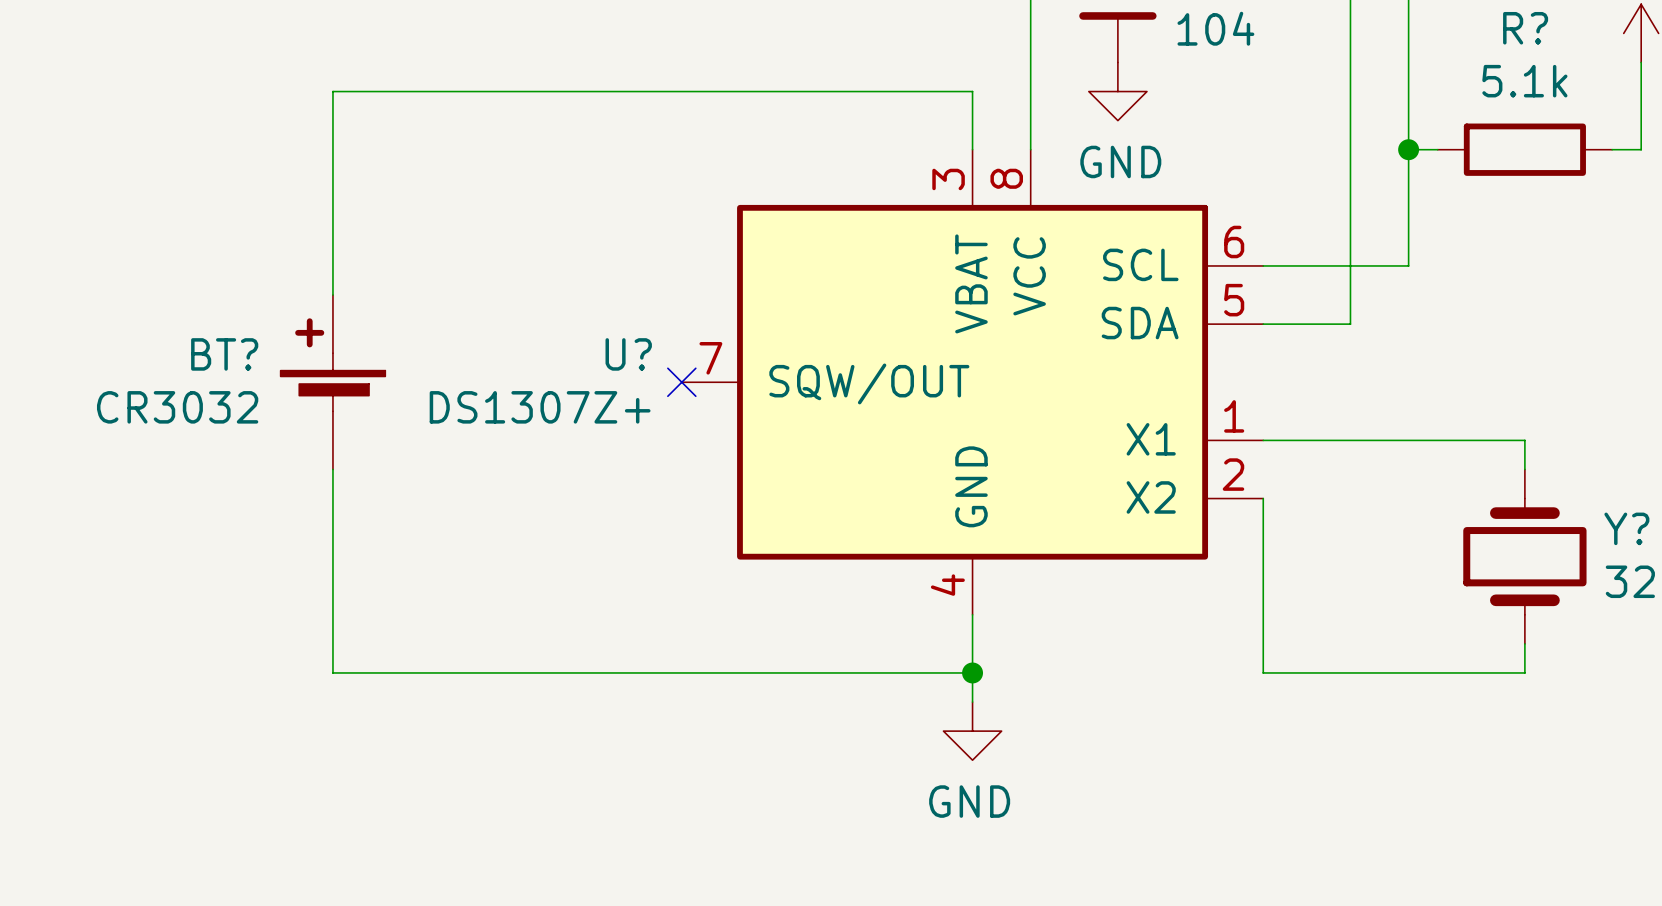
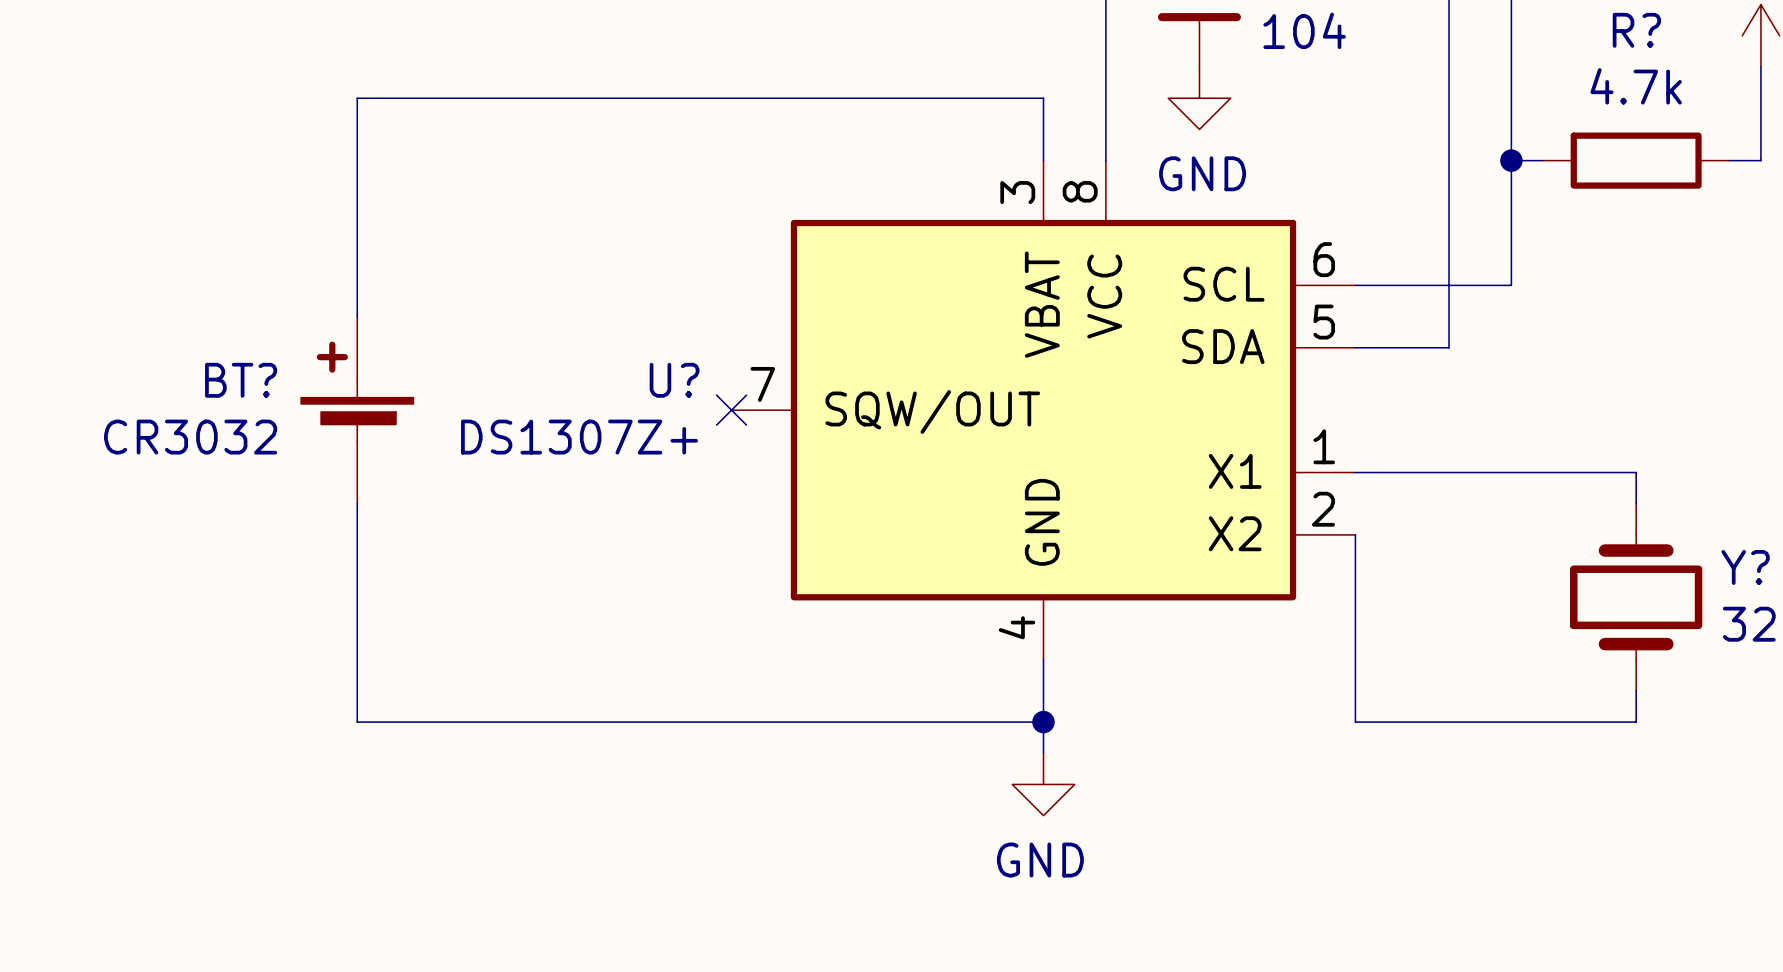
R? value: 5.1k (1524, 81) -> 4.7k (1636, 86)

